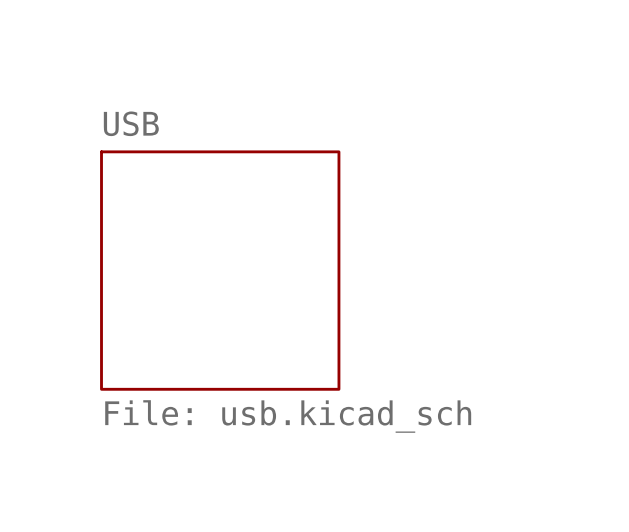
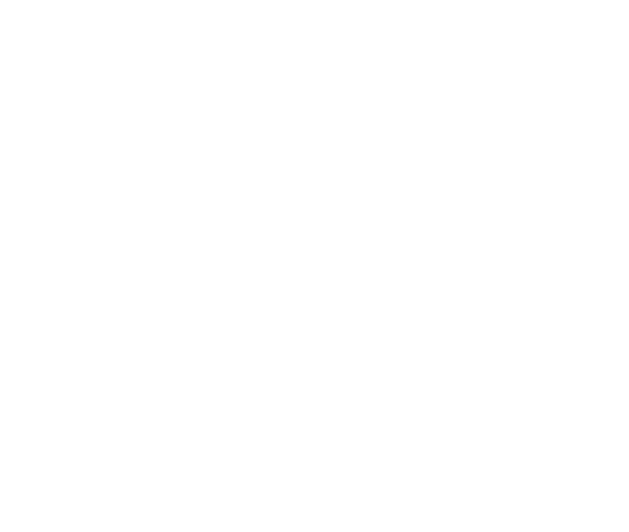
sheet USB: File: usb.kicad_sch (220, 270) -> none

